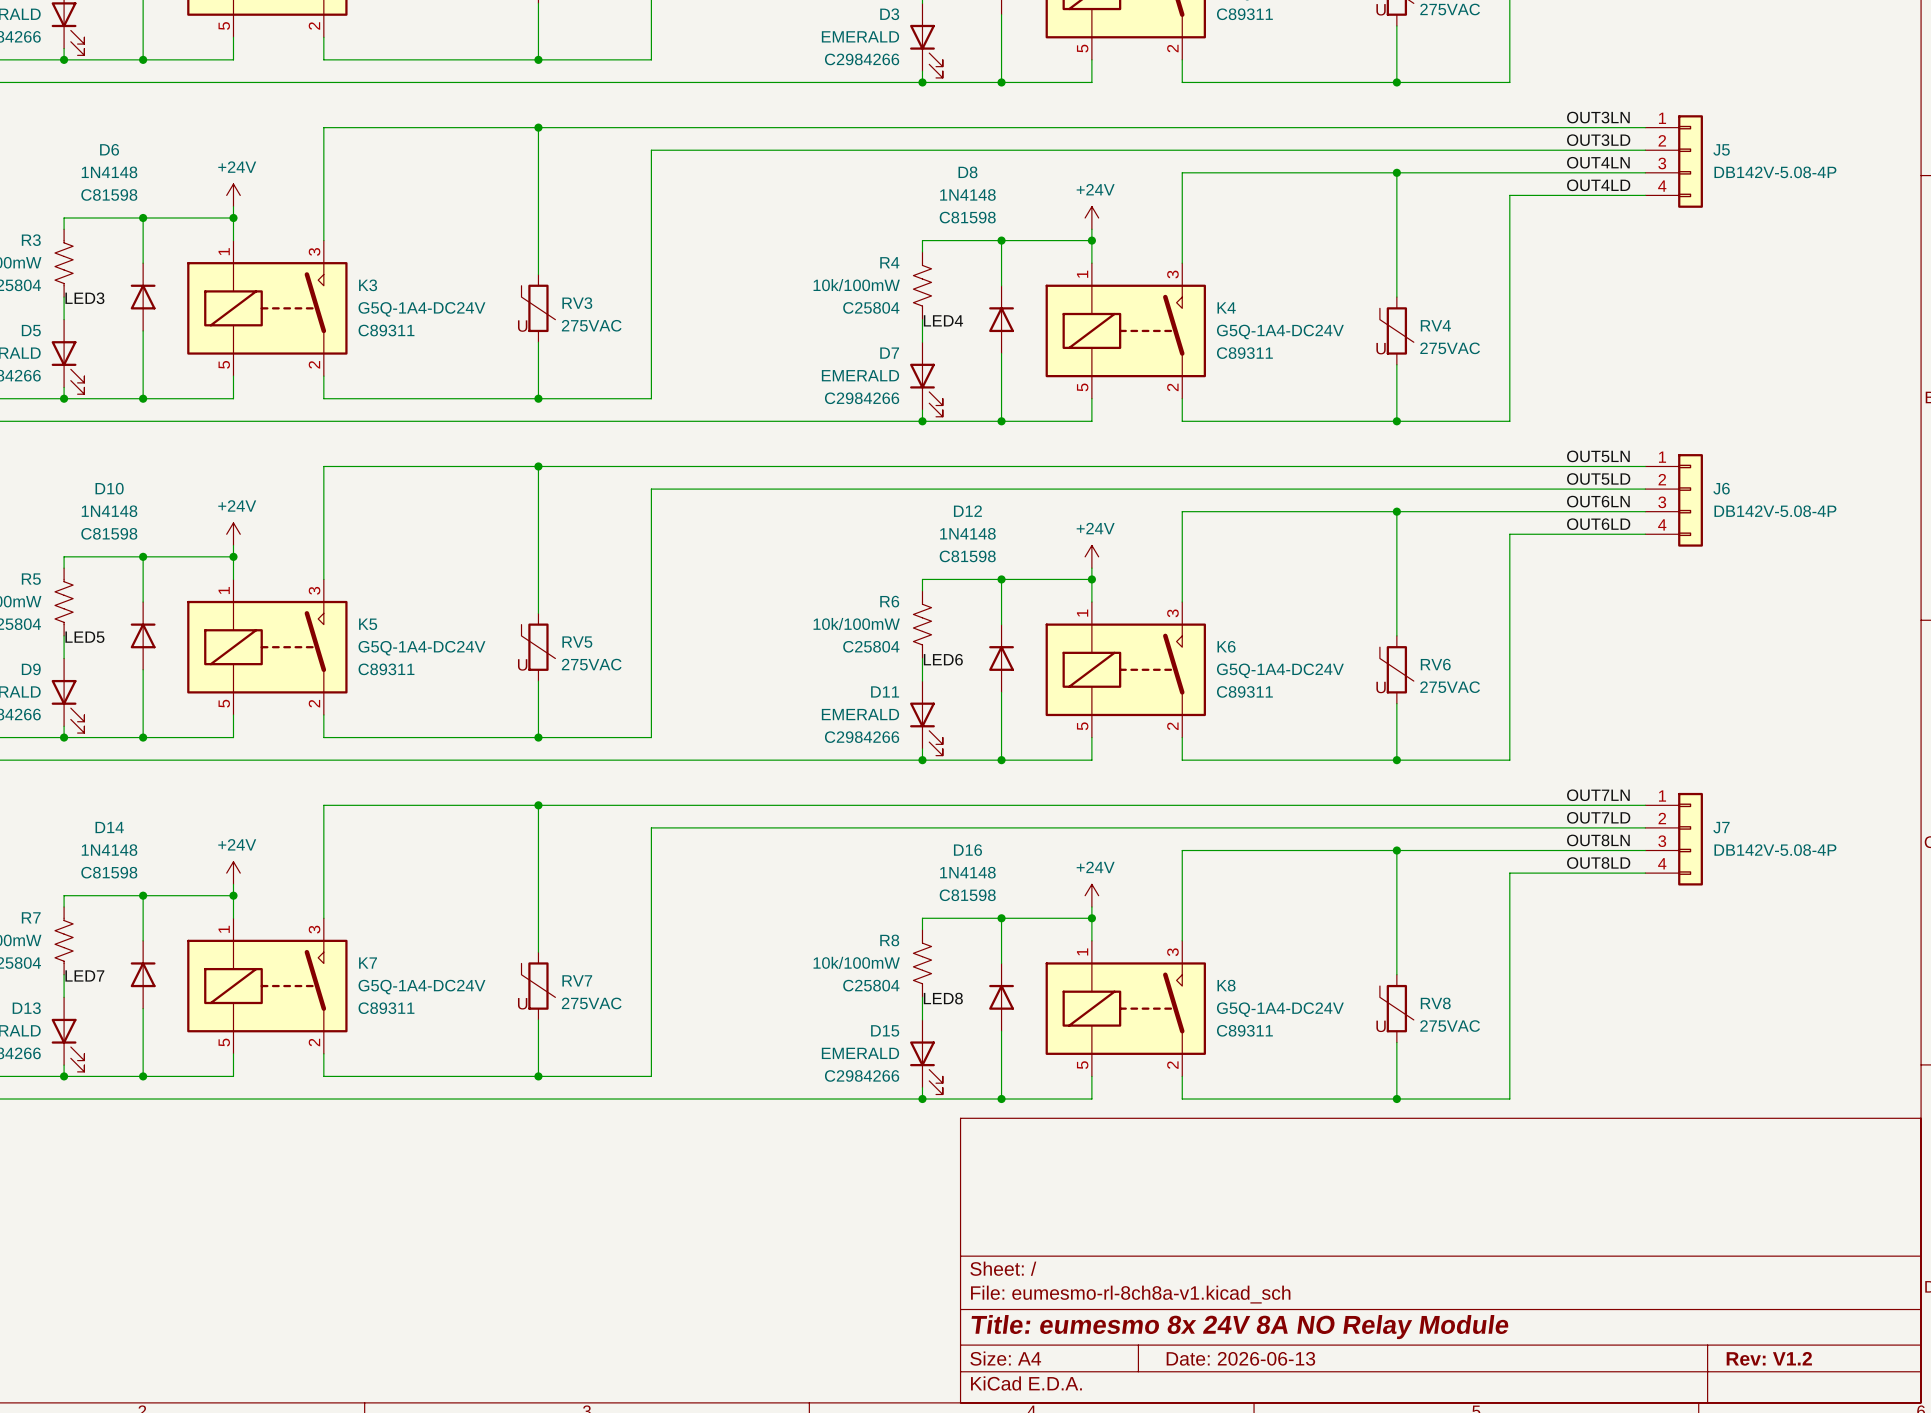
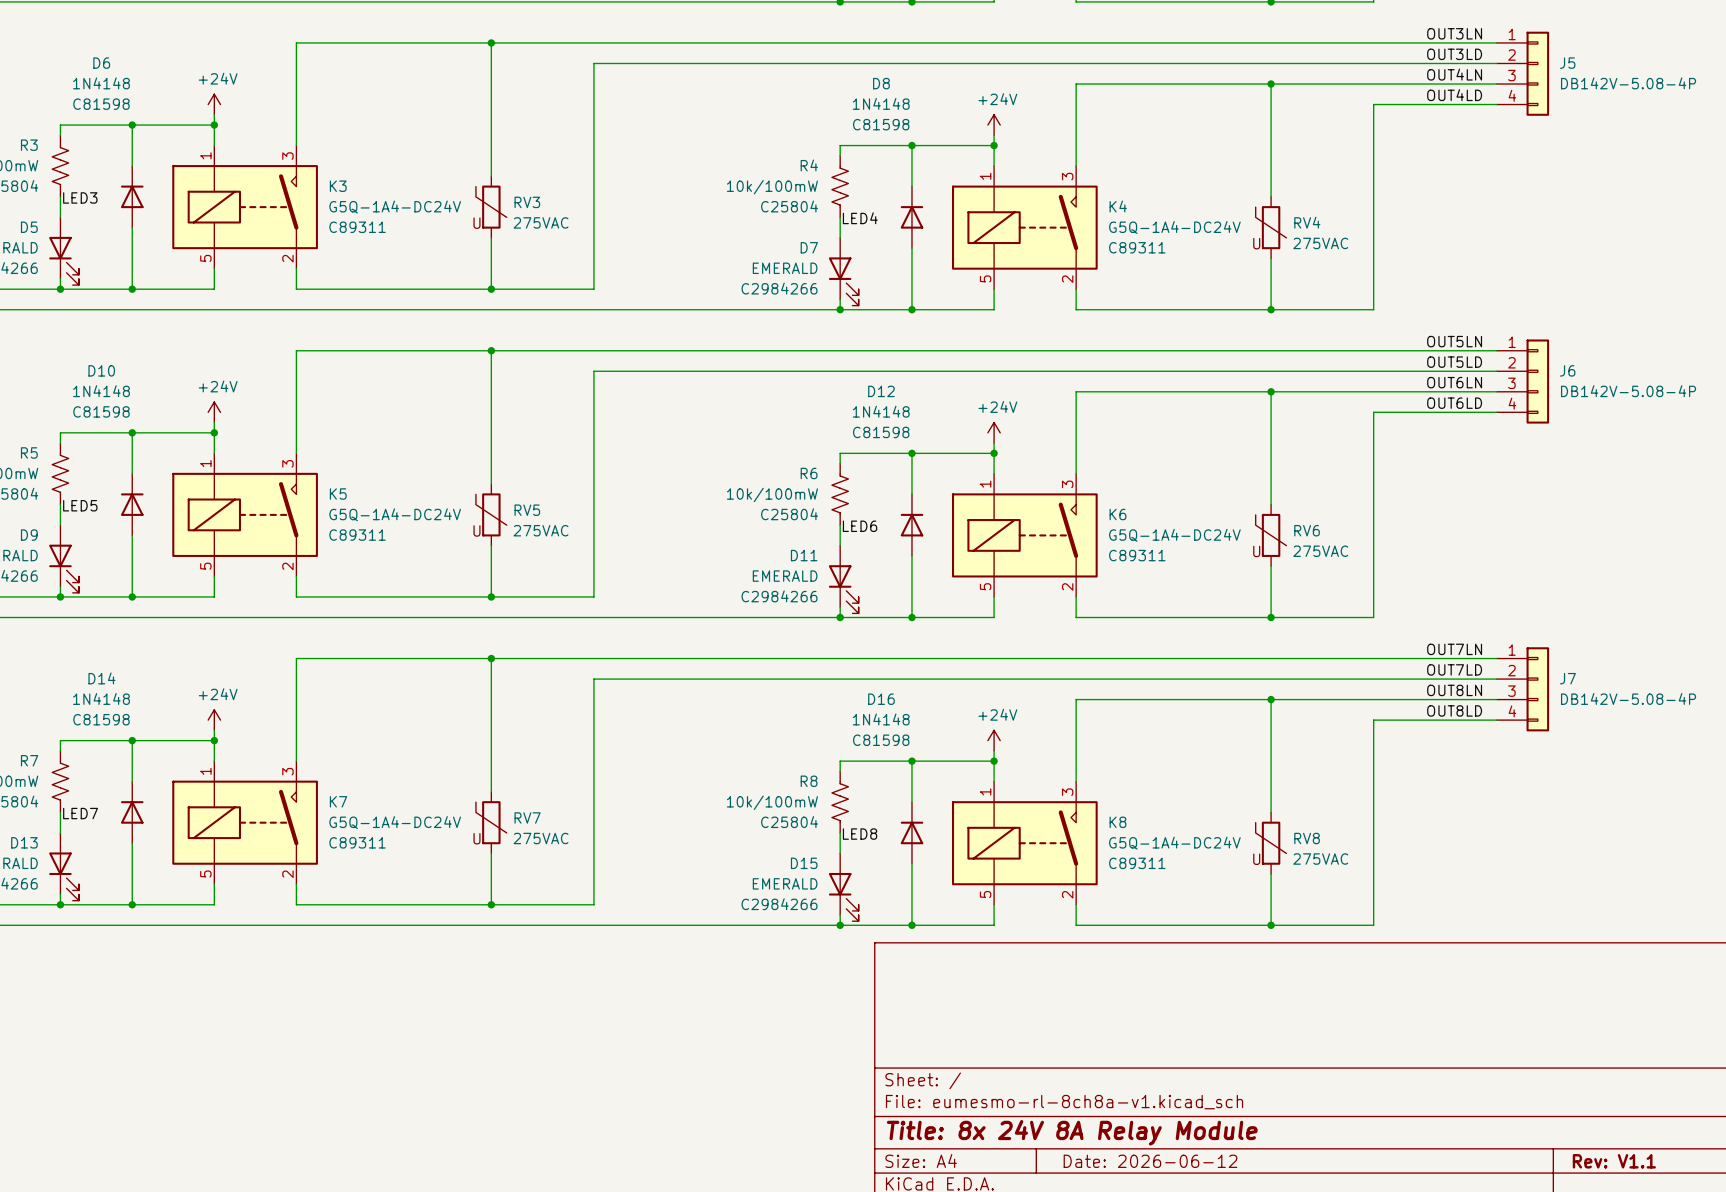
title block: Title: eumesmo 8x 24V 8A NO Relay Module (1240, 1327) -> Title: 8x 24V 8A Relay Module (1072, 1132)
title block: Date: 2026-06-13 (1240, 1358) -> Date: 2026-06-12 (1150, 1161)
title block: Rev: V1.2 (1769, 1358) -> Rev: V1.1 (1614, 1161)

